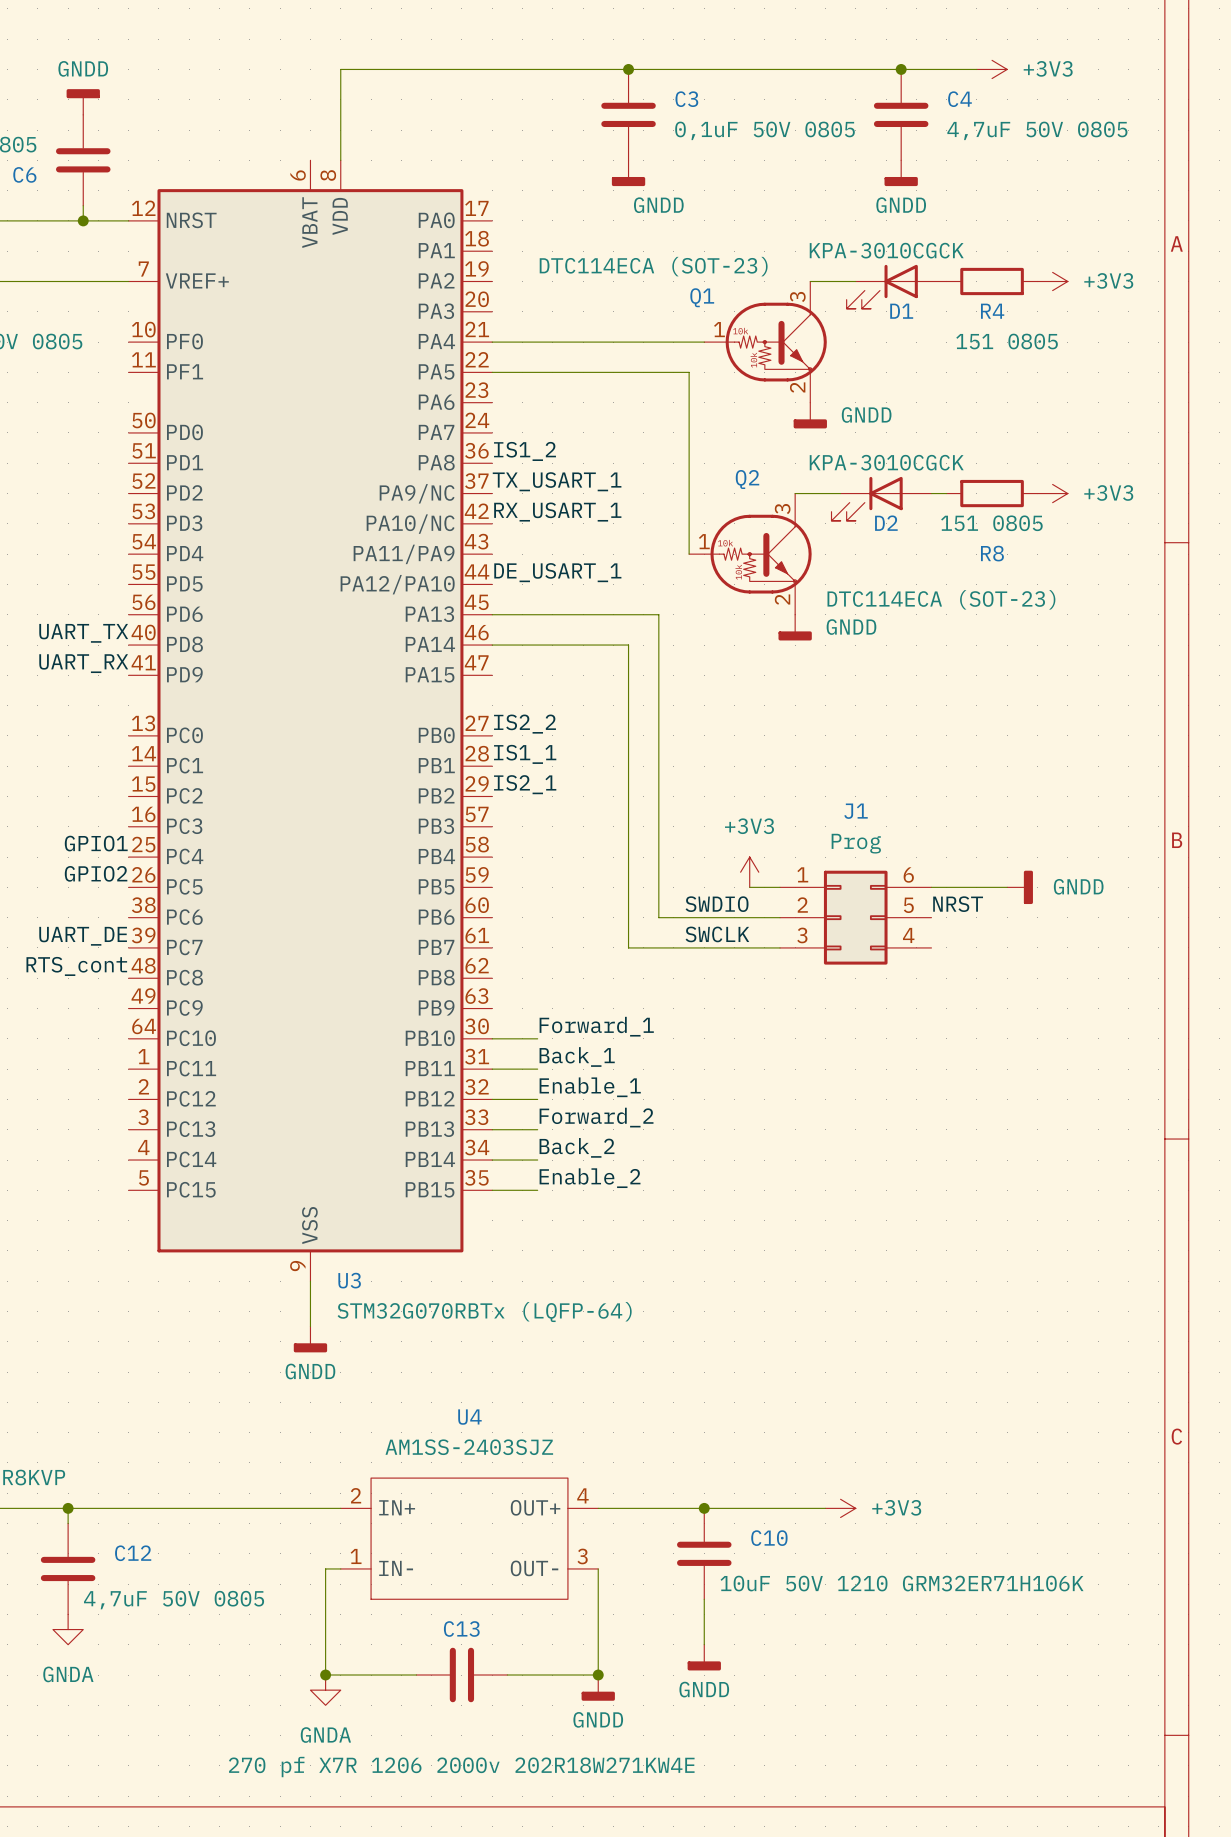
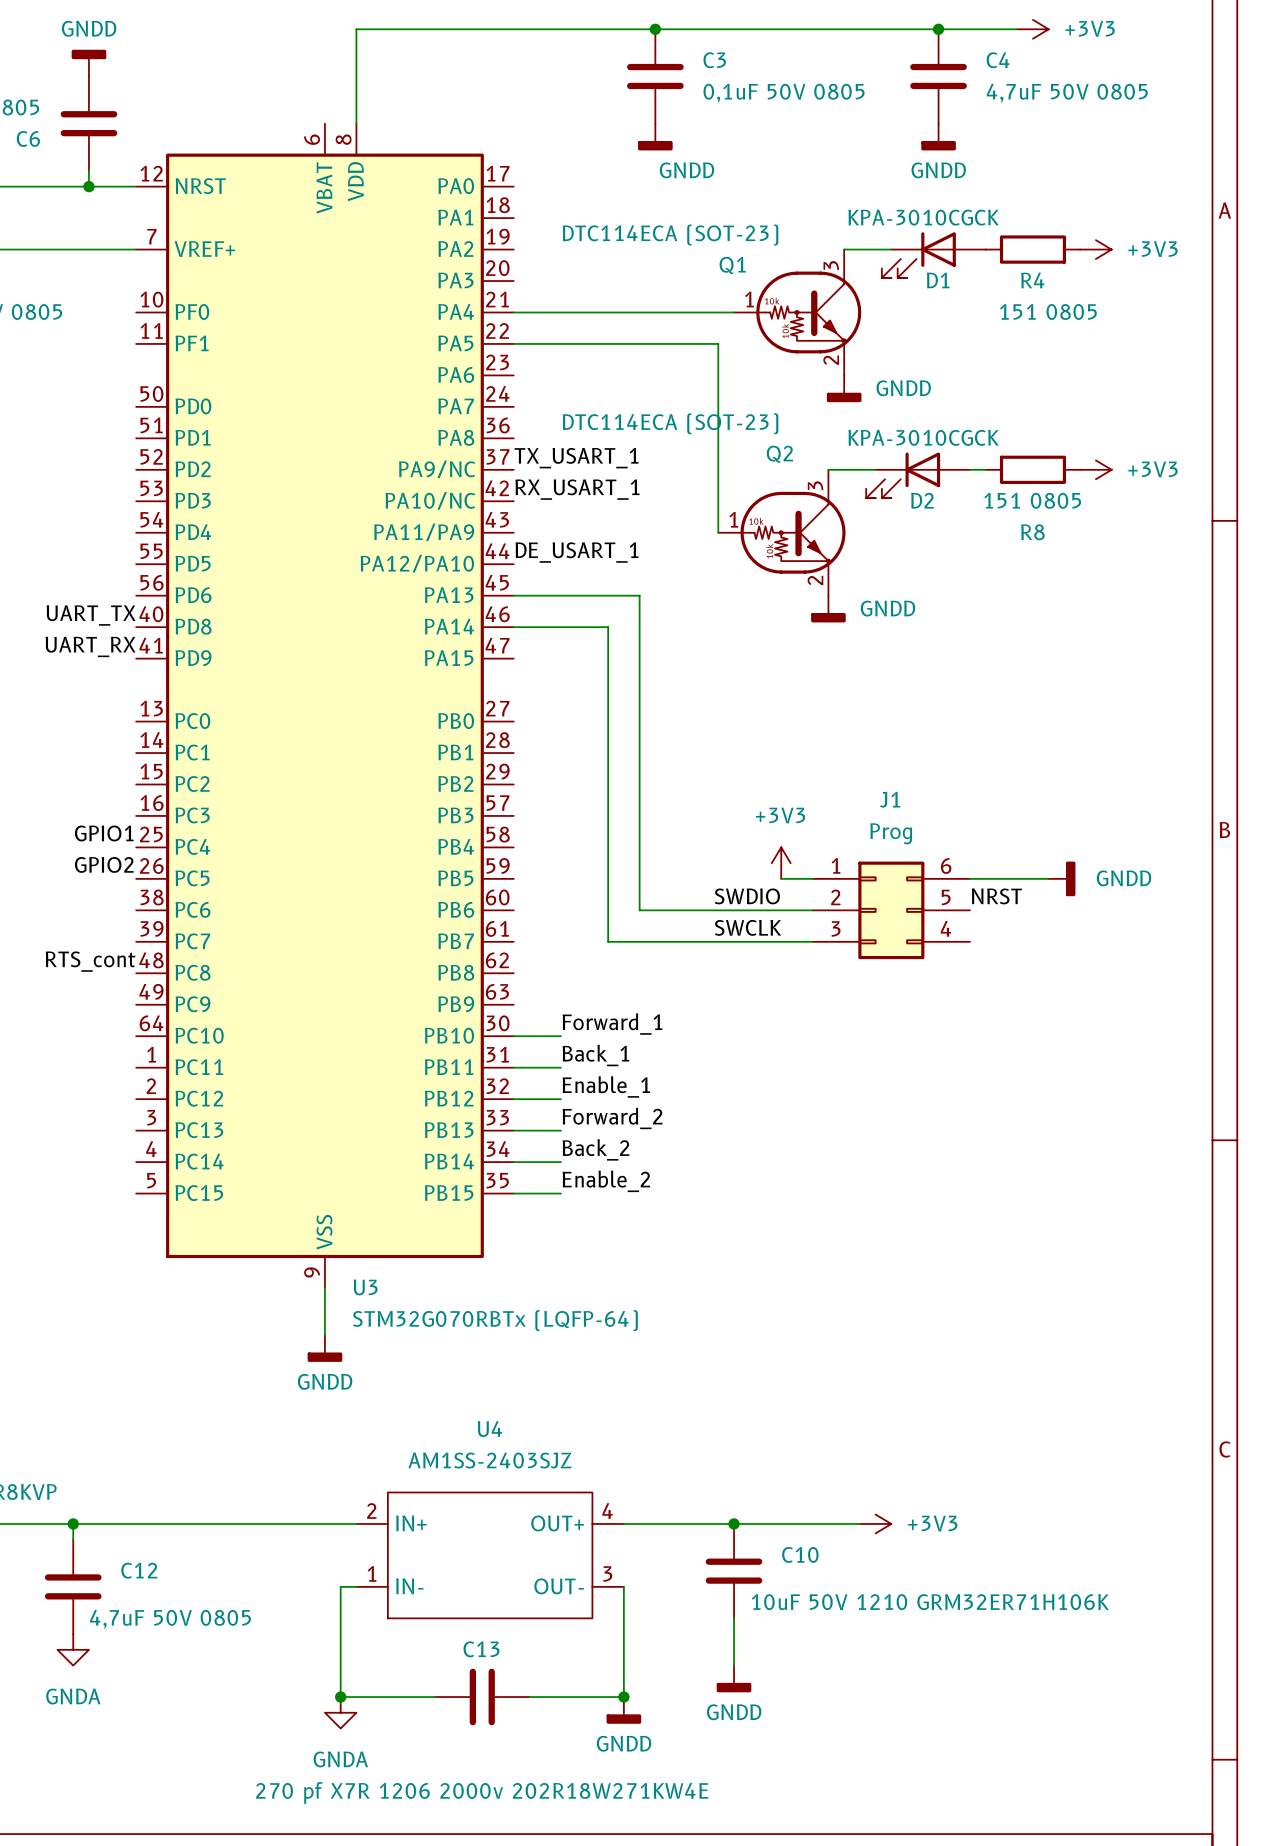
label: IS1_2 (524, 451) -> none
Q2 value position: DTC114ECA (SOT-23) (941, 599) -> DTC114ECA (SOT-23) (670, 423)
wire: (613, 614) (658, 614) (658, 917) -> (639, 595) (639, 910) (686, 910)
wire: (583, 645) (628, 645) (628, 947) -> (608, 627) (608, 941) (655, 941)
label: IS2_2 (524, 724) -> none
label: IS1_1 (525, 754) -> none
label: IS2_1 (525, 784) -> none
label: UART_DE (83, 936) -> none

